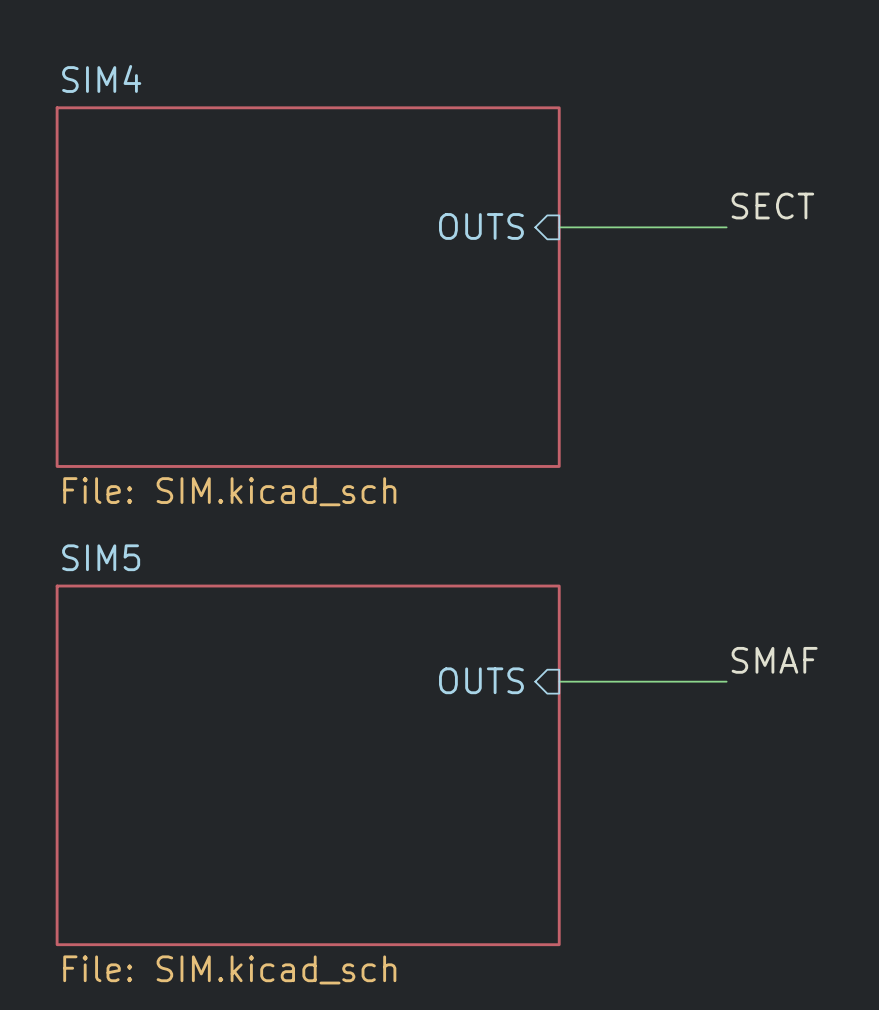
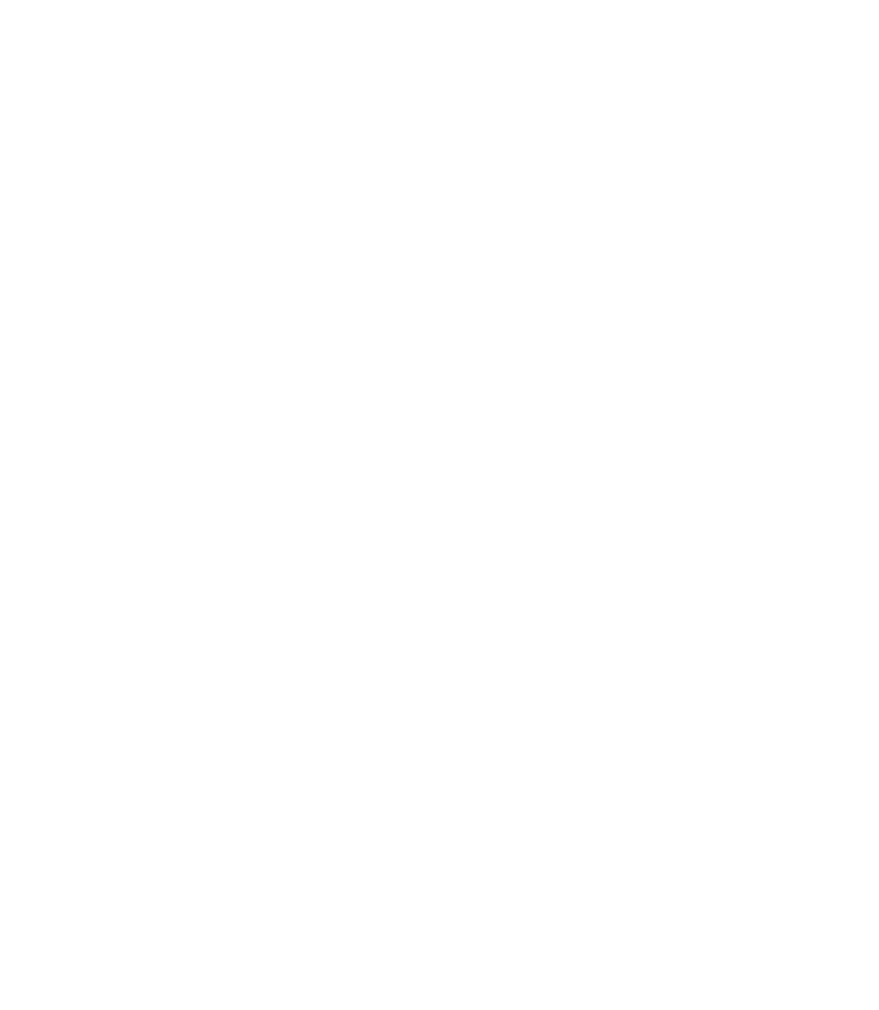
label: SECT (772, 206) -> none
sheet pin: OUTS (481, 226) -> none
wire: (559, 227) (726, 227) -> none
sheet SIM4: File: SIM.kicad_sch (308, 287) -> none
label: SMAF (774, 660) -> none
sheet pin: OUTS (481, 680) -> none
wire: (559, 681) (726, 681) -> none
sheet SIM5: File: SIM.kicad_sch (308, 765) -> none

